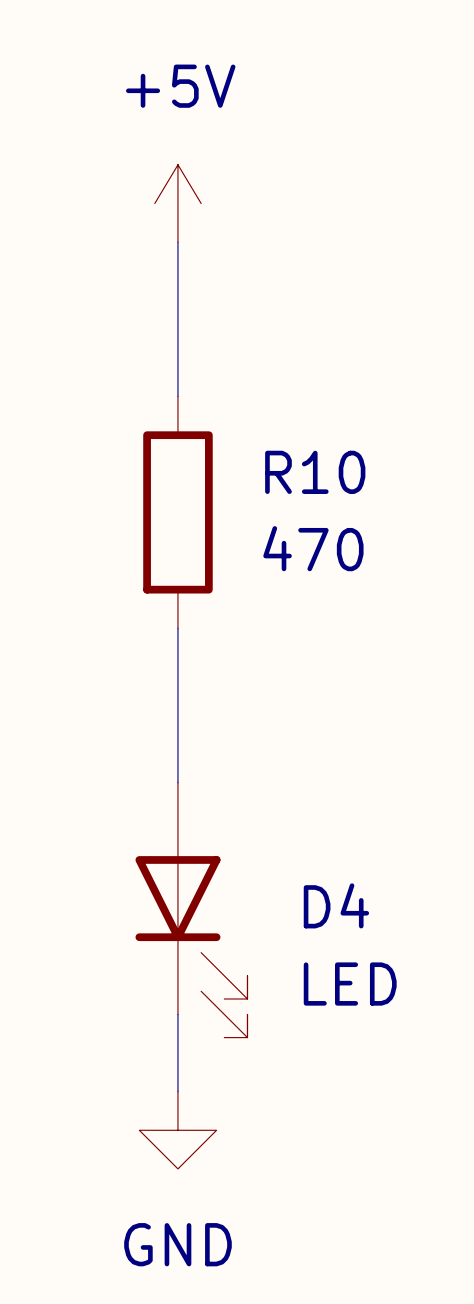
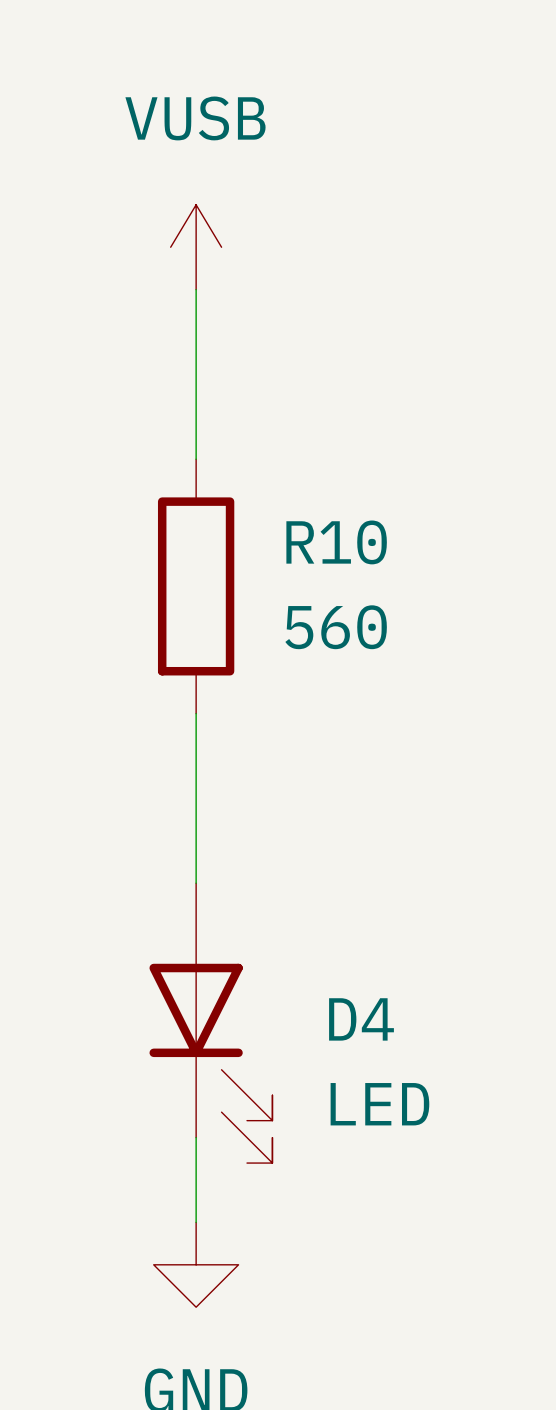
power symbol: +5V (177, 203) -> VUSB (196, 247)
R10 value: 470 (313, 548) -> 560 (336, 627)

